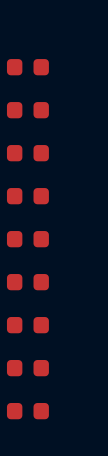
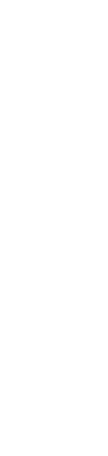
part: (27, 67) -> none
part: (27, 110) -> none
part: (27, 153) -> none
part: (27, 196) -> none
part: (27, 239) -> none
part: (27, 282) -> none
part: (27, 325) -> none
part: (27, 368) -> none
part: (27, 411) -> none

